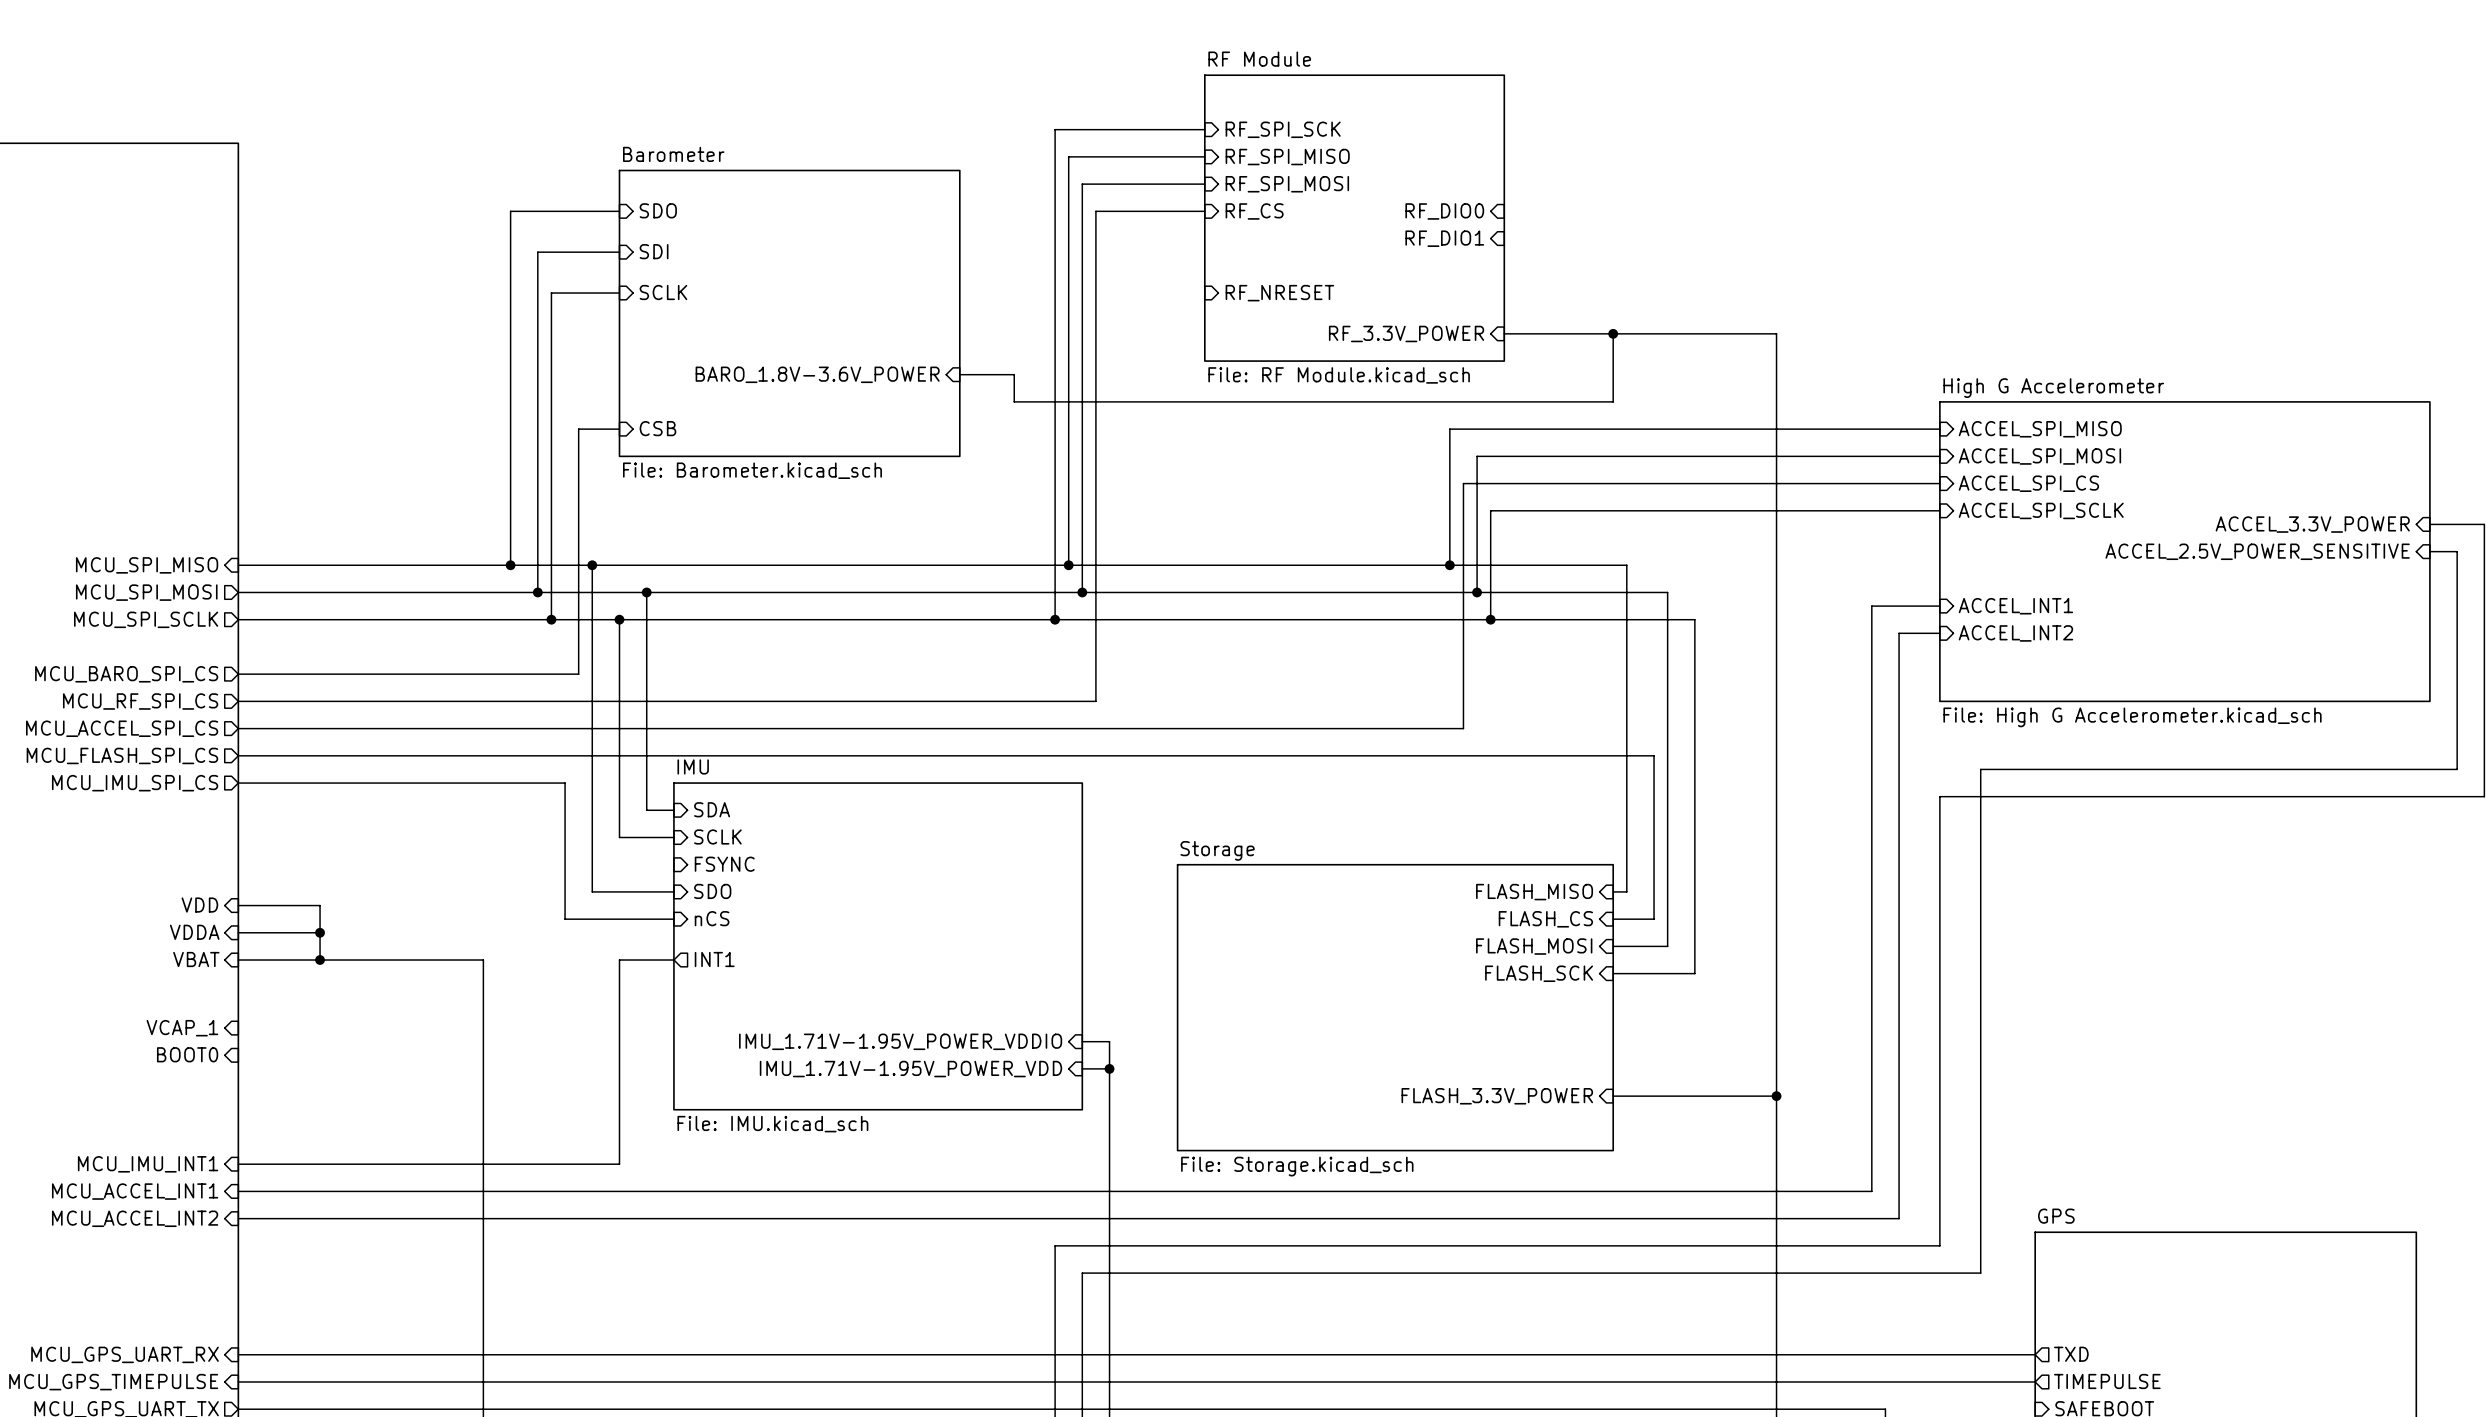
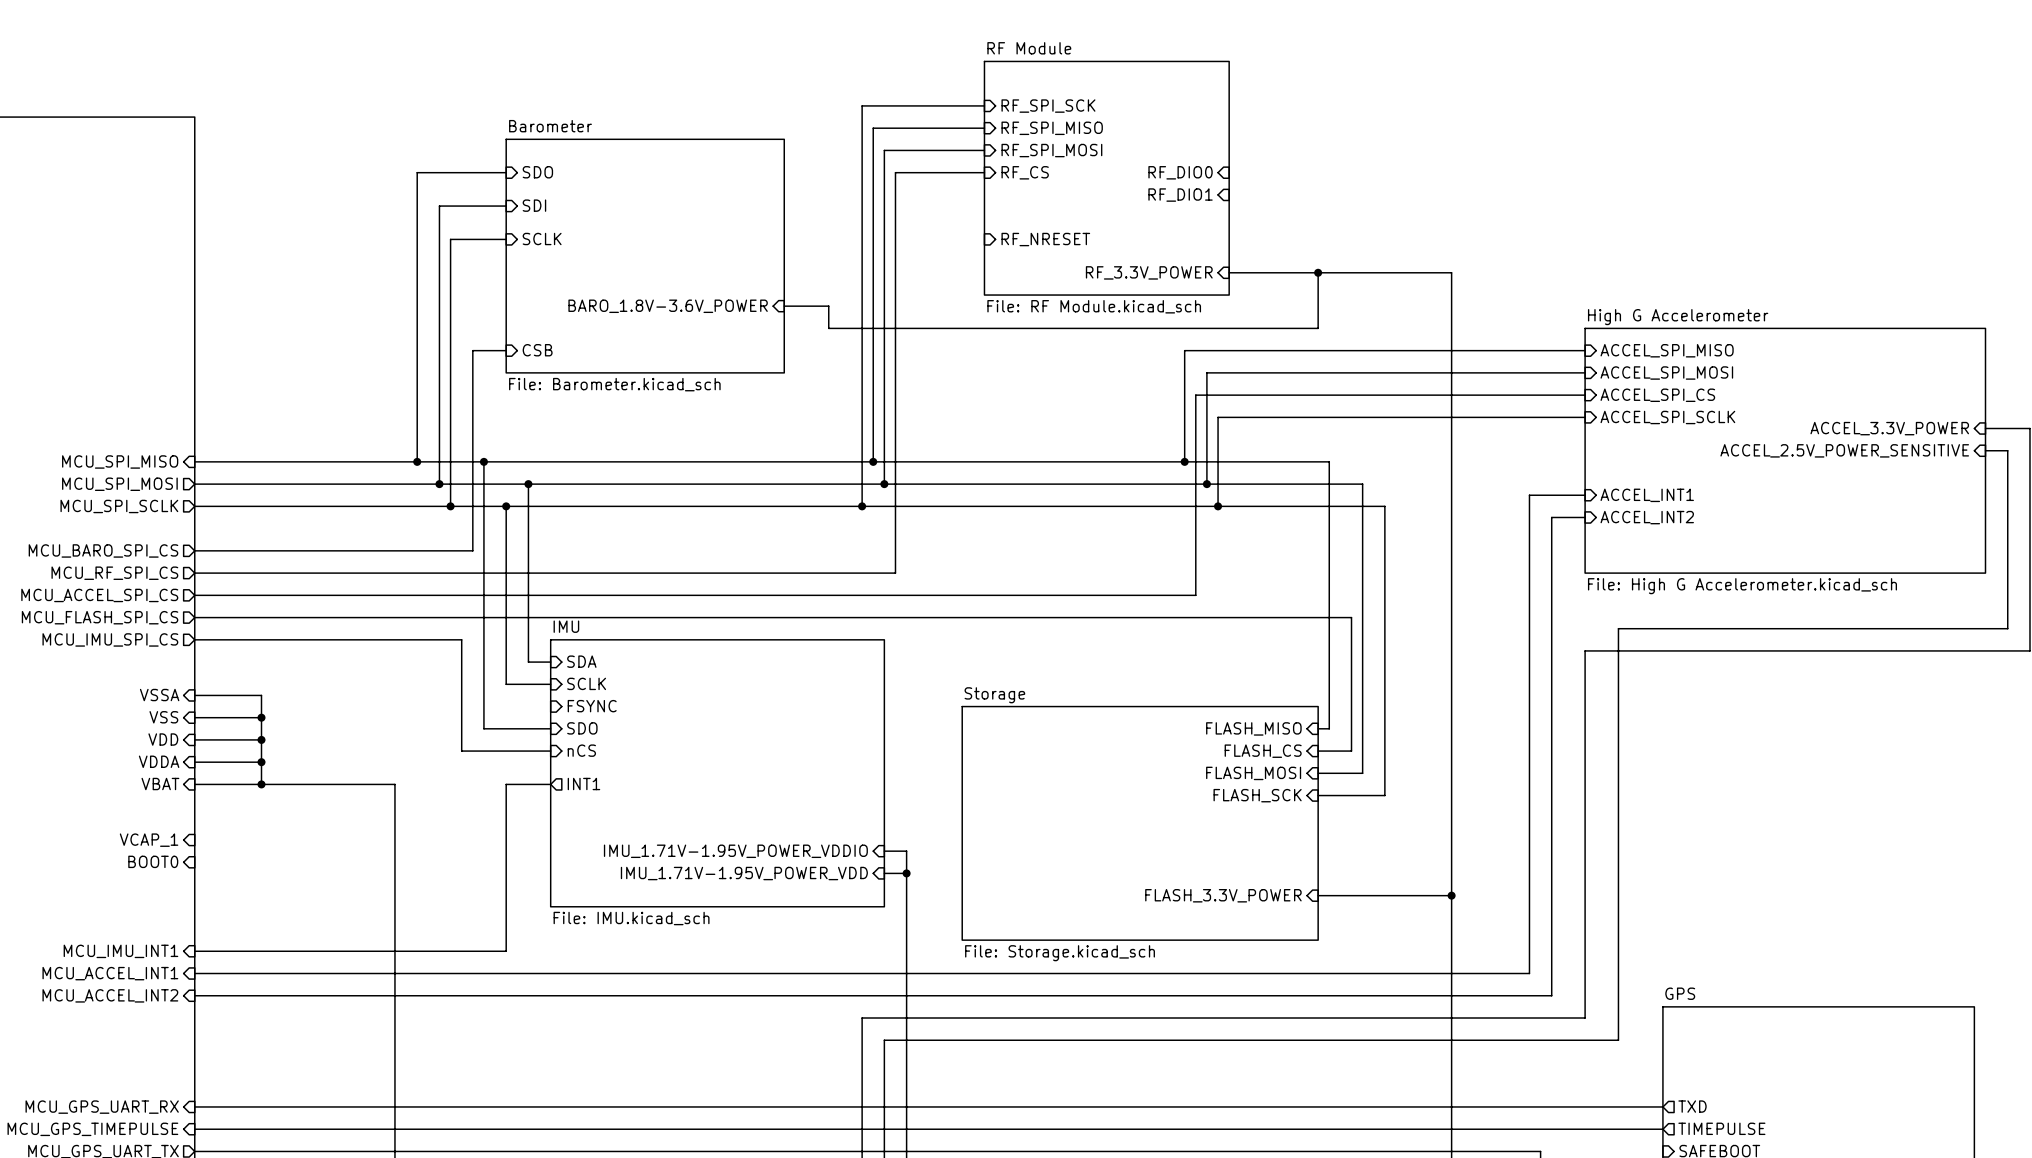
sheet pin: none -> VSSA (159, 695)
wire: none -> (194, 695) (261, 695) (261, 739)
sheet pin: none -> VSS (163, 717)
wire: none -> (194, 717) (261, 717)
junction: none -> (261, 717)
junction: none -> (261, 739)

